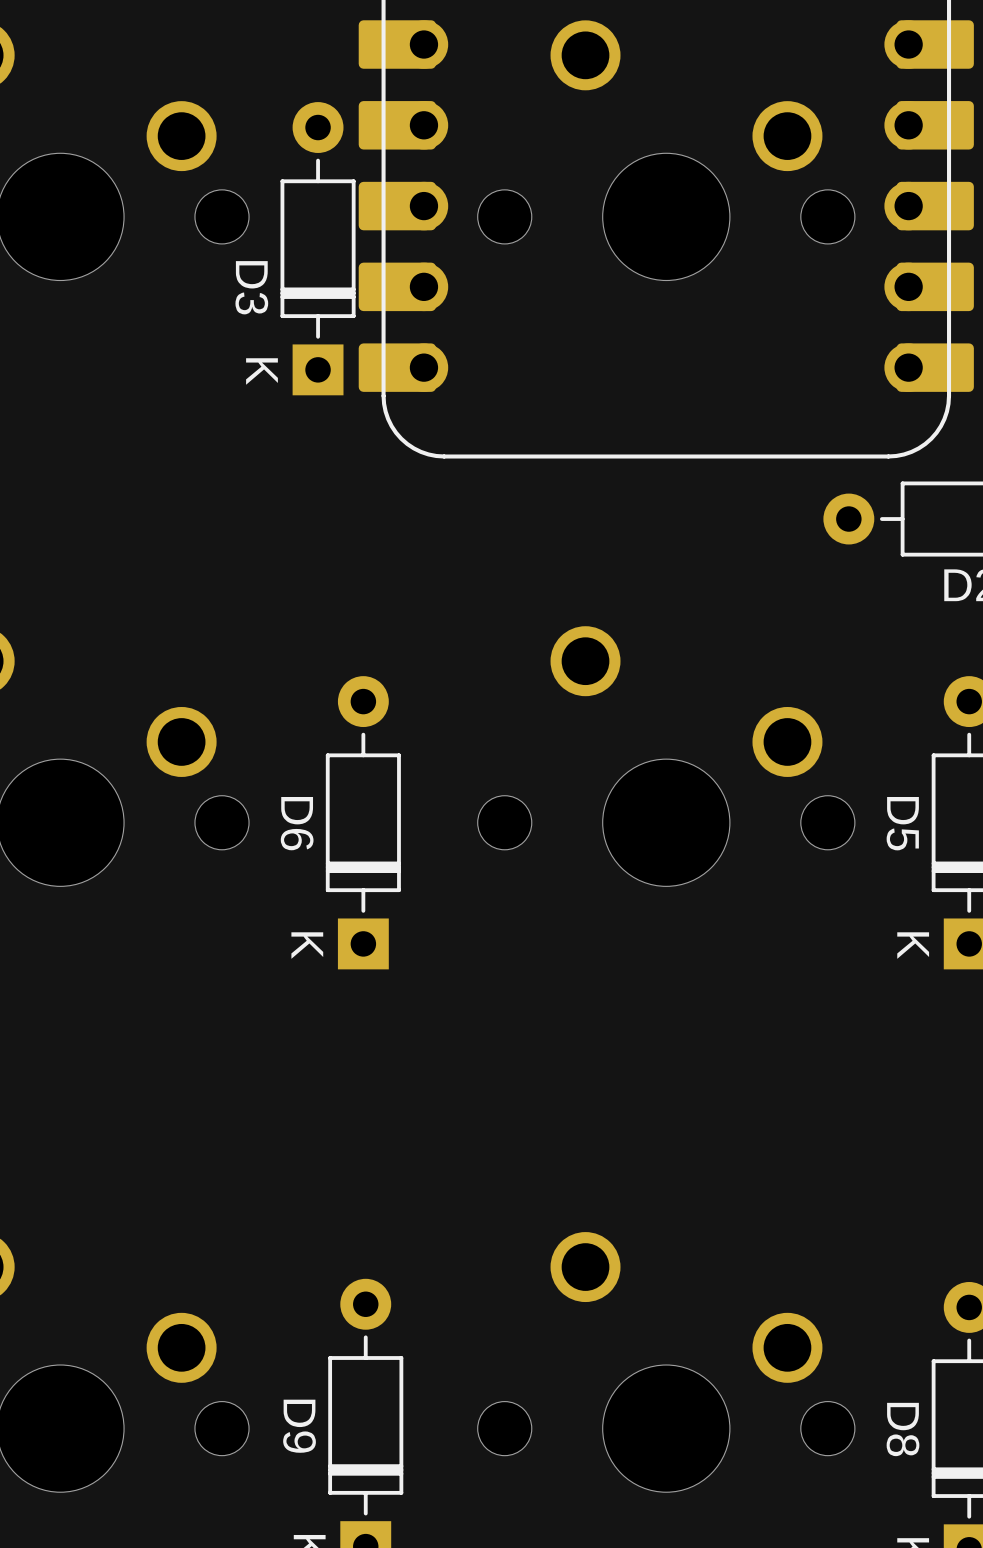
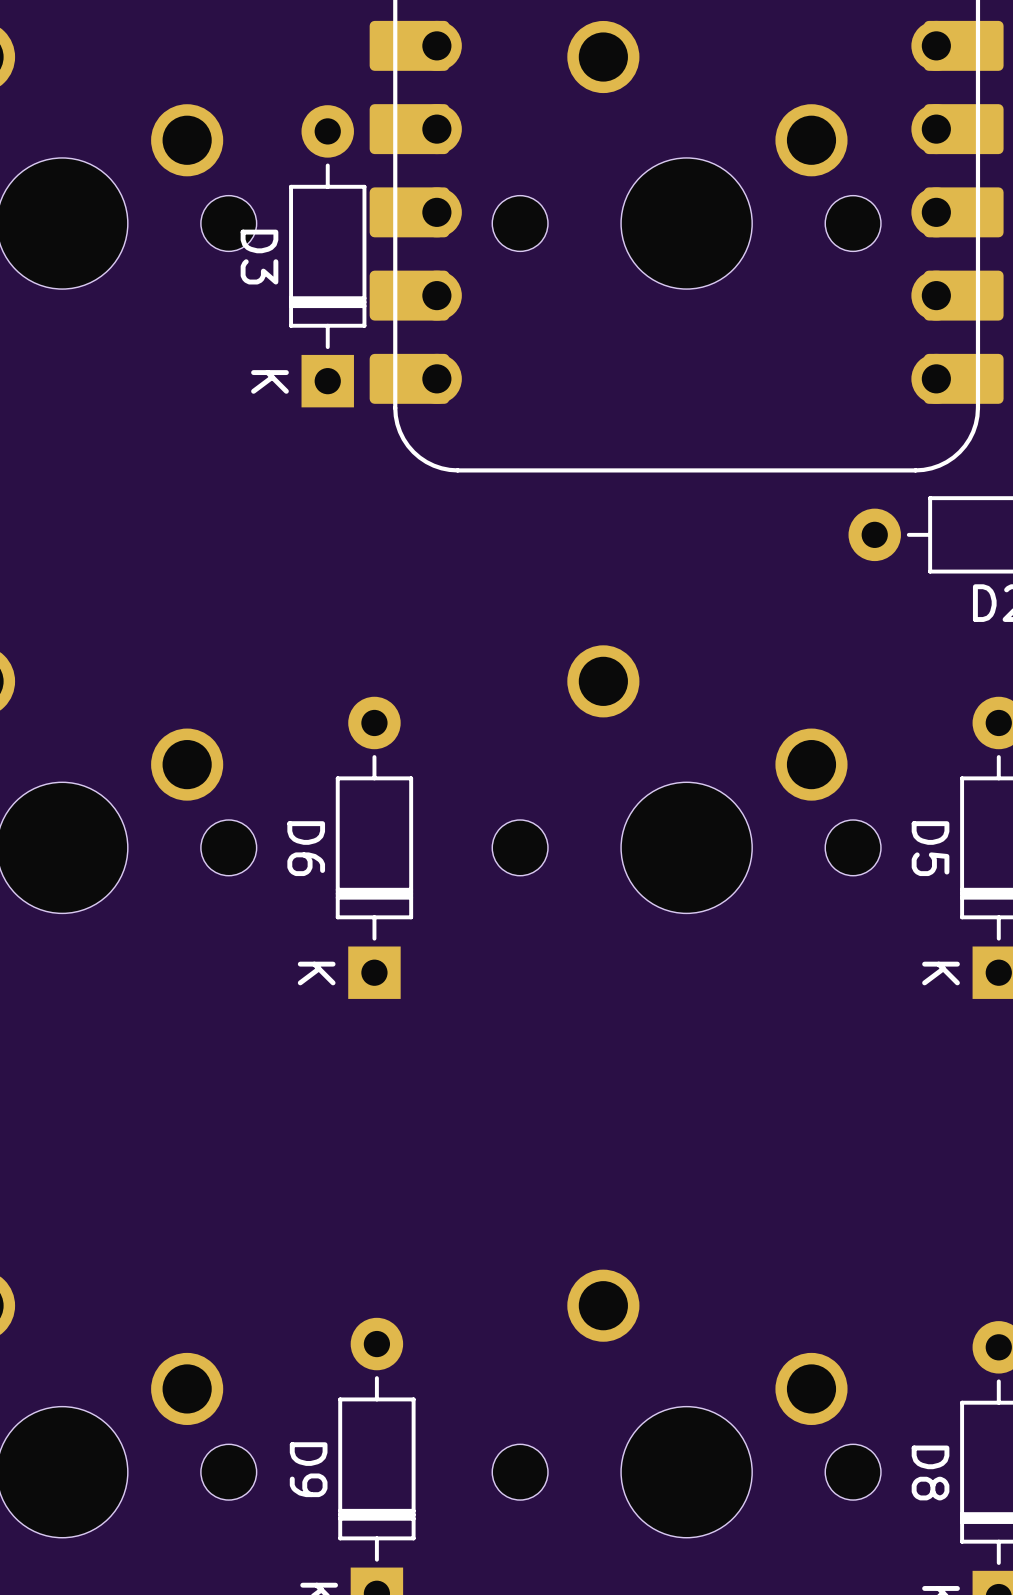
D3 name position: D3 (251, 287) -> D3 (259, 257)

